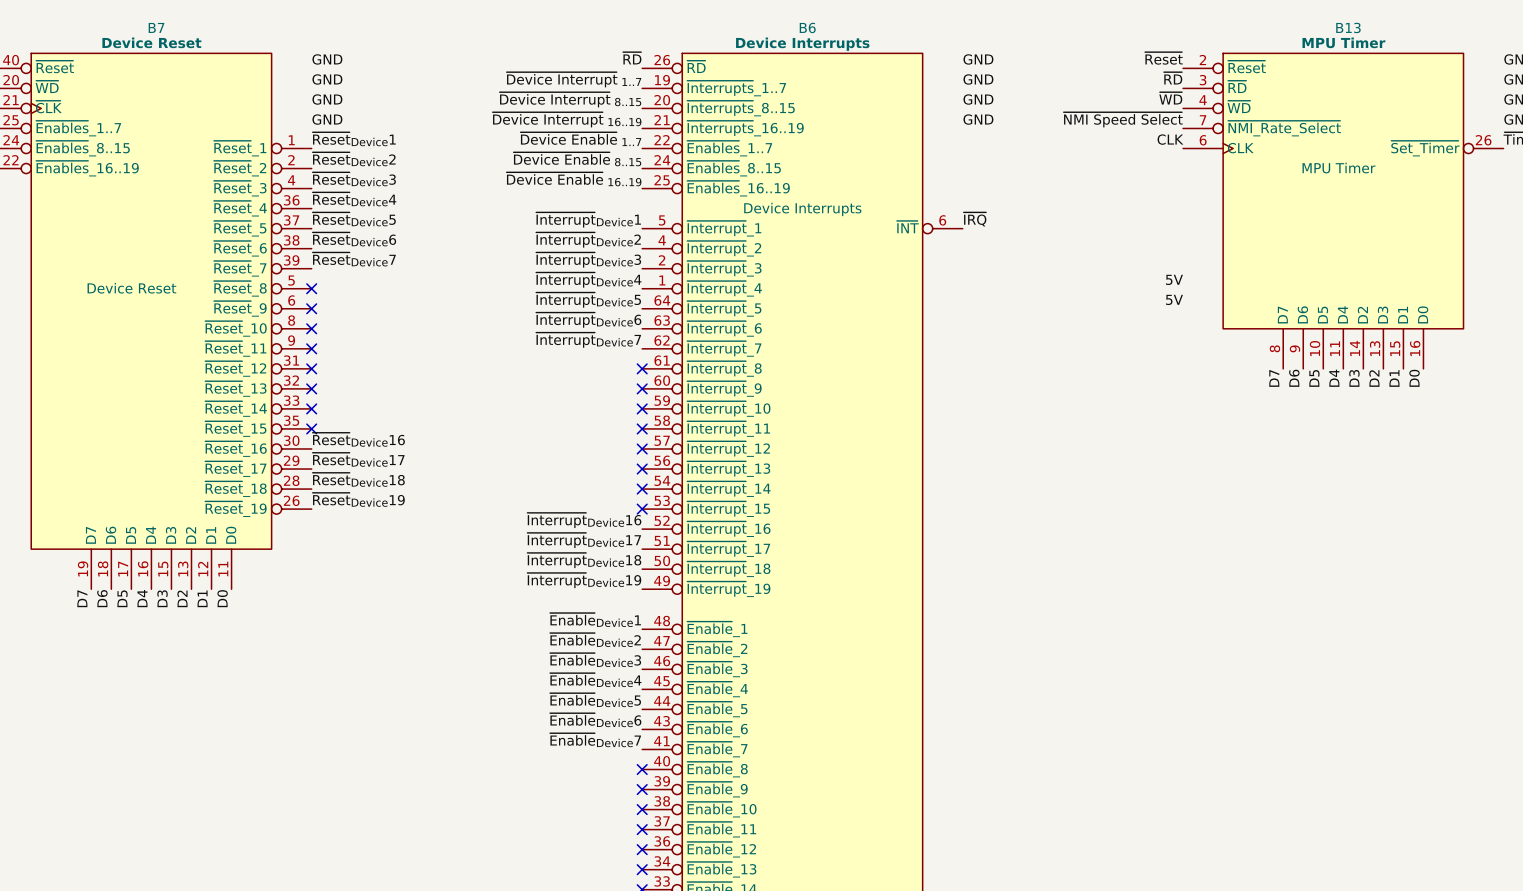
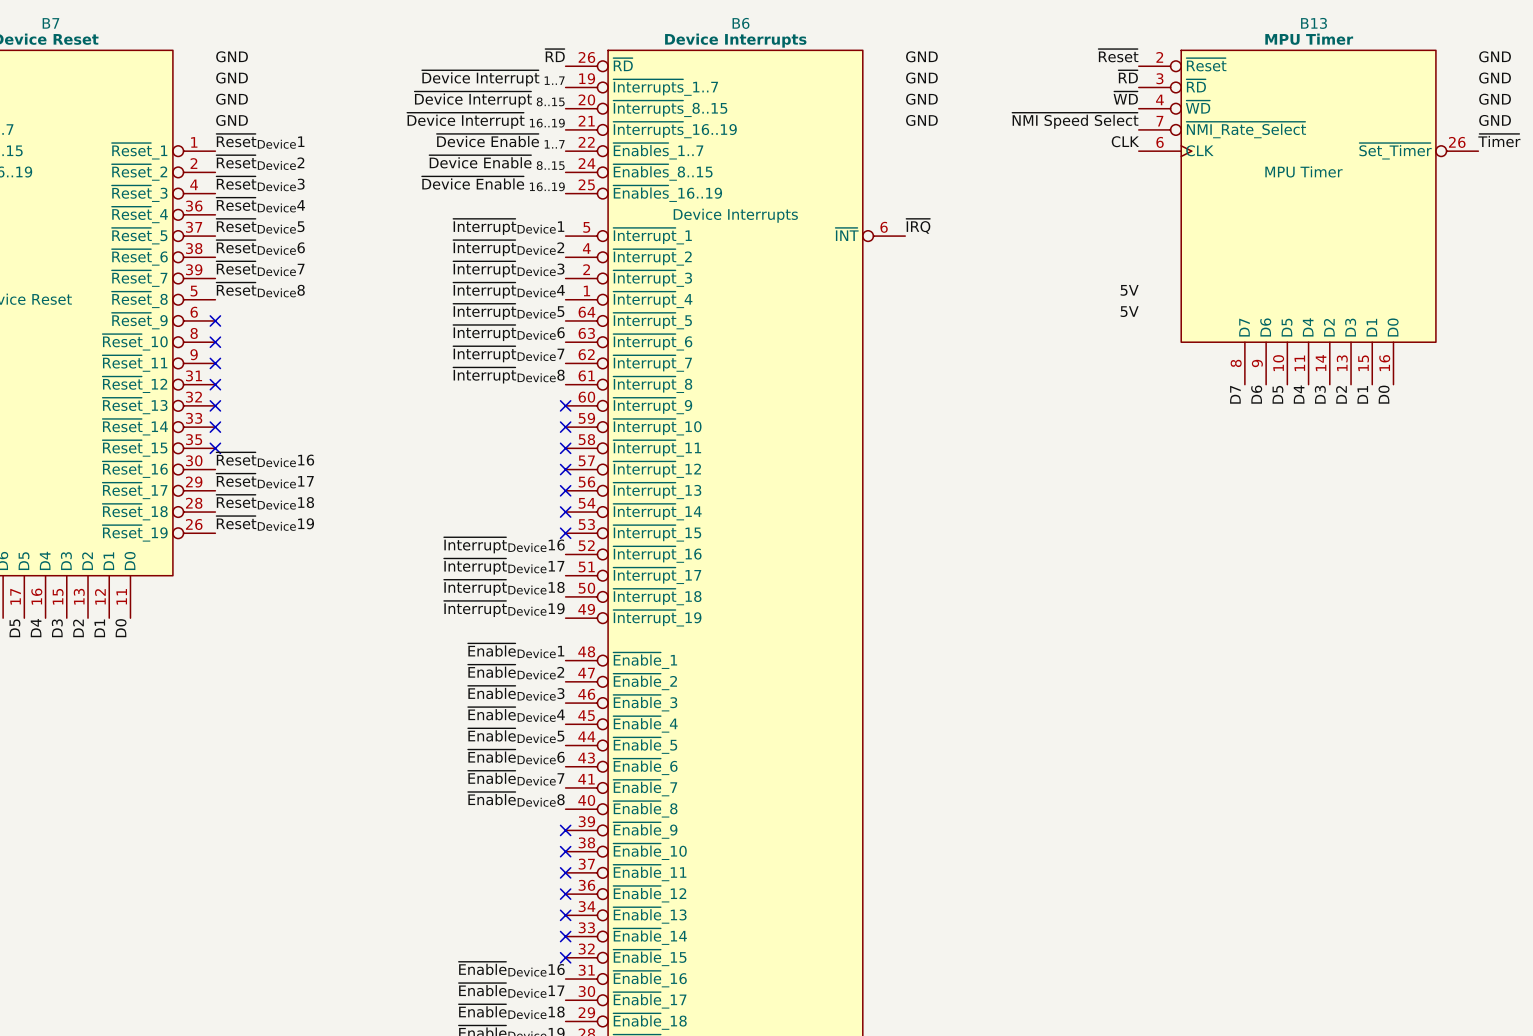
label: none -> ~{Reset}Device8 (260, 289)
no-connect mark: (311, 288) -> none
label: none -> ~{Interrupt}Device8 (508, 375)
no-connect mark: (642, 368) -> none
label: none -> ~{Enable}Device8 (516, 799)
no-connect mark: (642, 769) -> none

